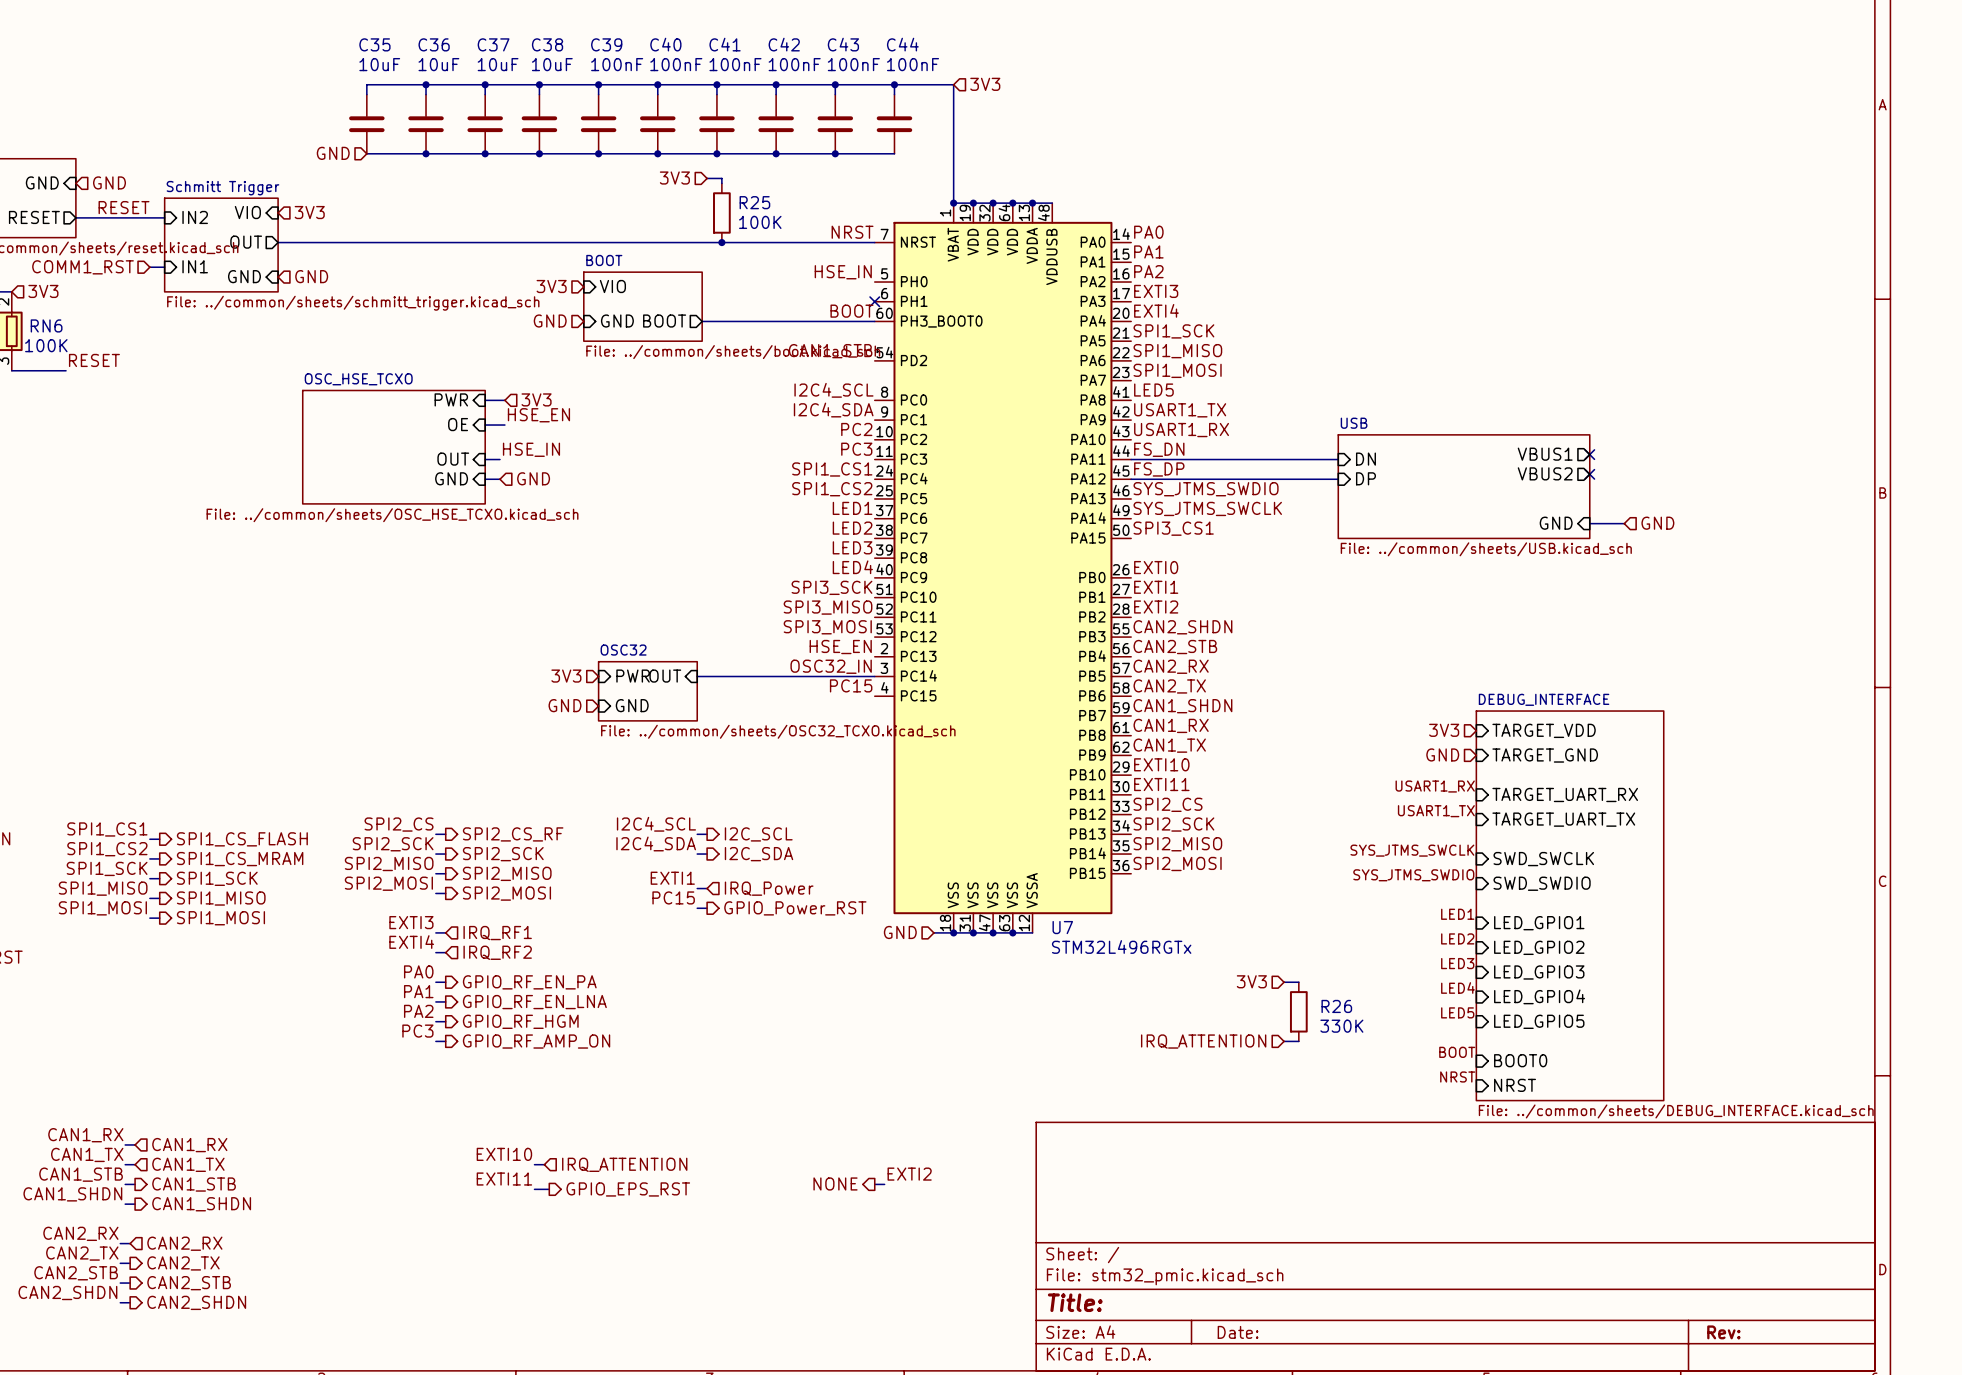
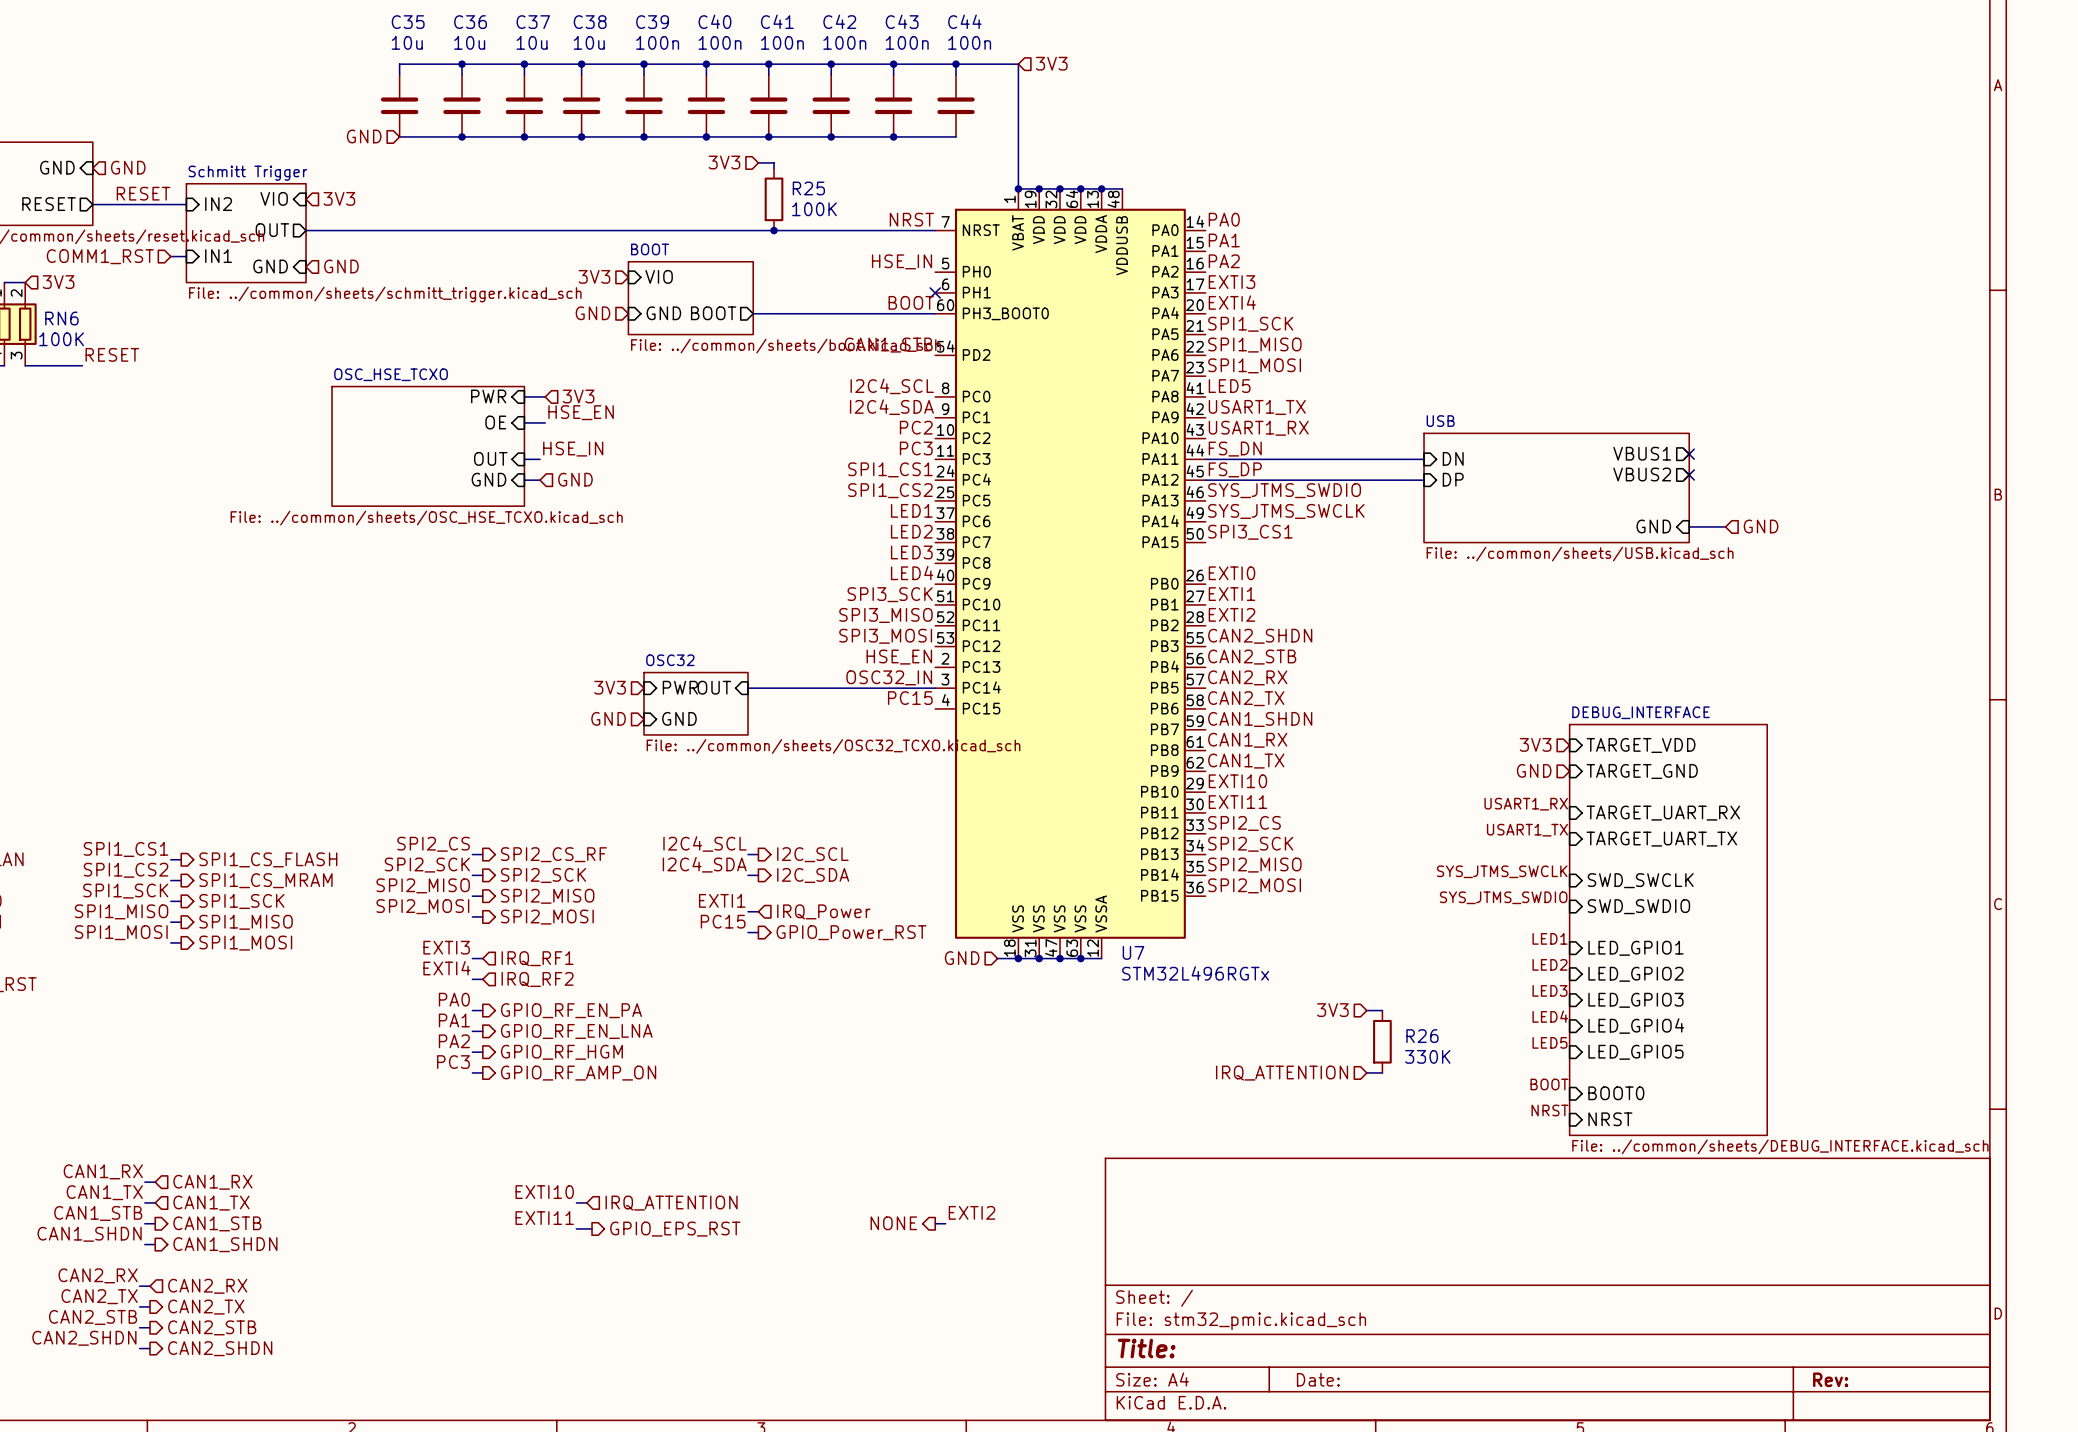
C35 value: 10uF (379, 64) -> 10u (407, 42)
C36 value: 10uF (438, 64) -> 10u (469, 42)
C37 value: 10uF (498, 64) -> 10u (532, 42)
C38 value: 10uF (552, 64) -> 10u (589, 42)
C39 value: 100nF (617, 64) -> 100n (657, 42)
C40 value: 100nF (676, 64) -> 100n (720, 42)
C41 value: 100nF (735, 64) -> 100n (782, 42)
C42 value: 100nF (794, 64) -> 100n (844, 42)
C43 value: 100nF (853, 64) -> 100n (907, 42)
C44 value: 100nF (913, 64) -> 100n (969, 42)

